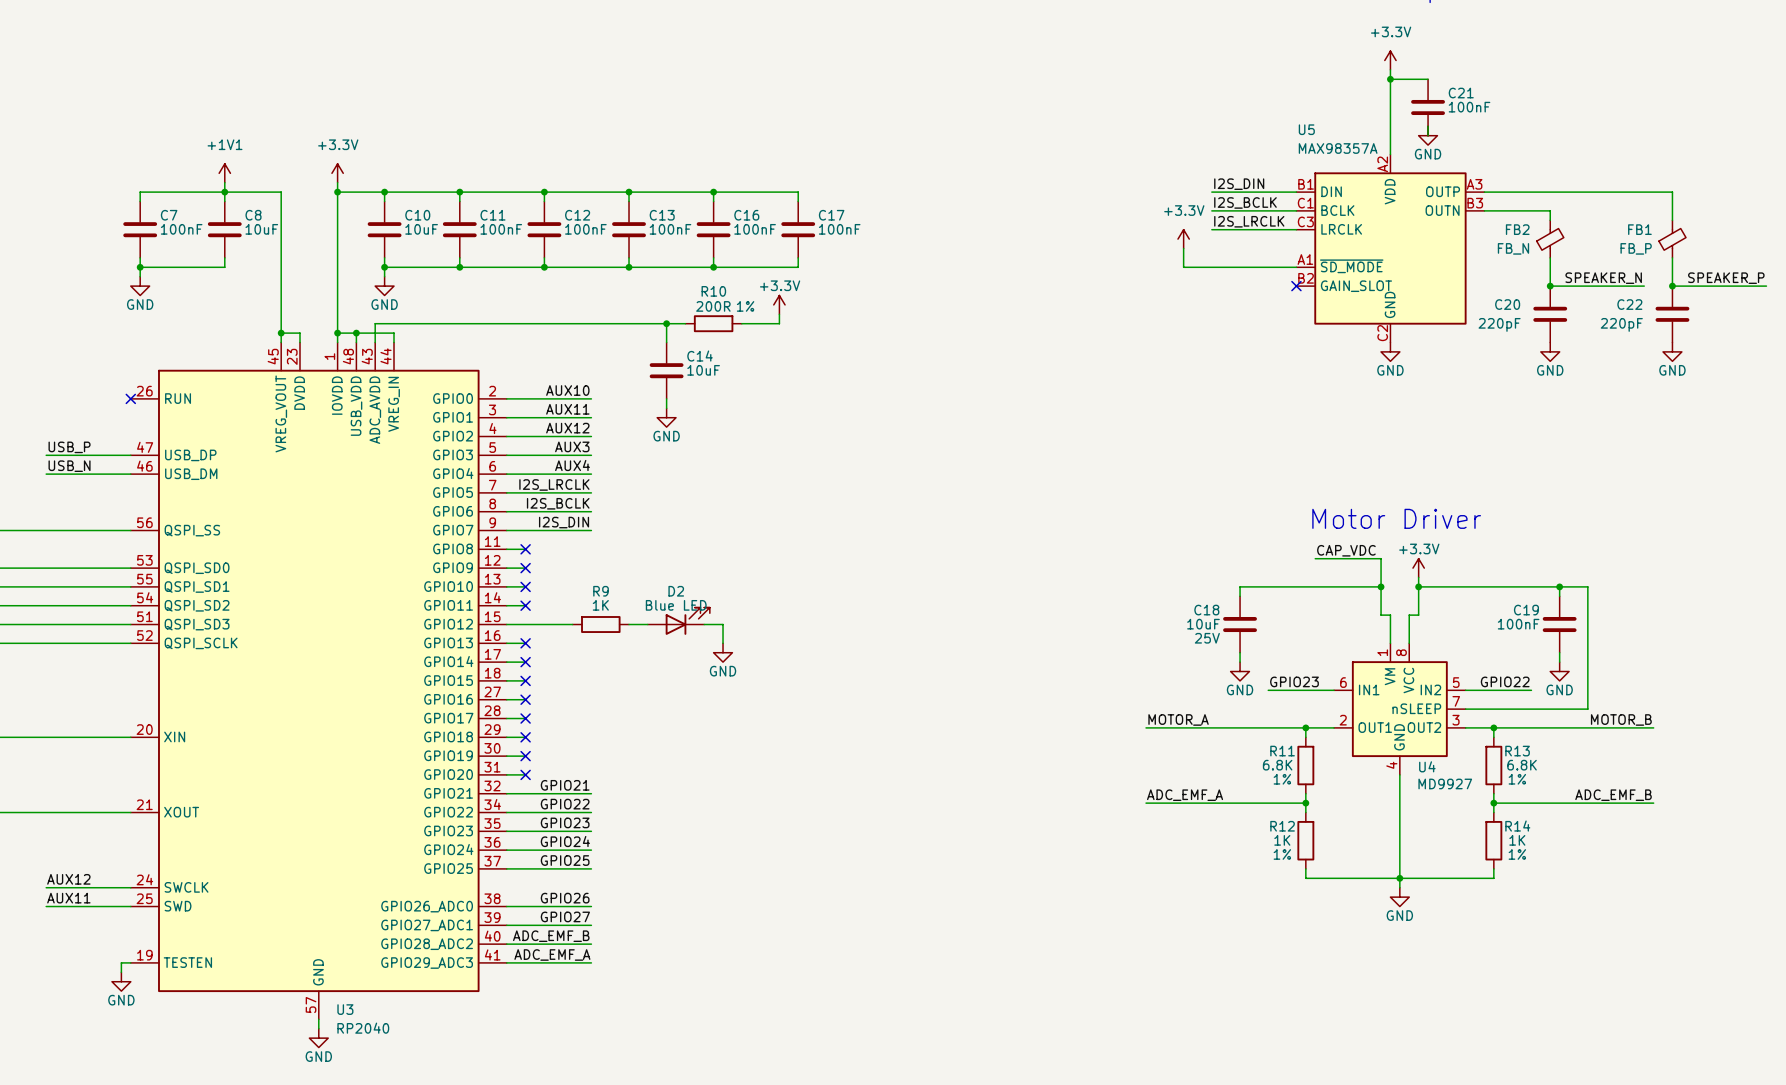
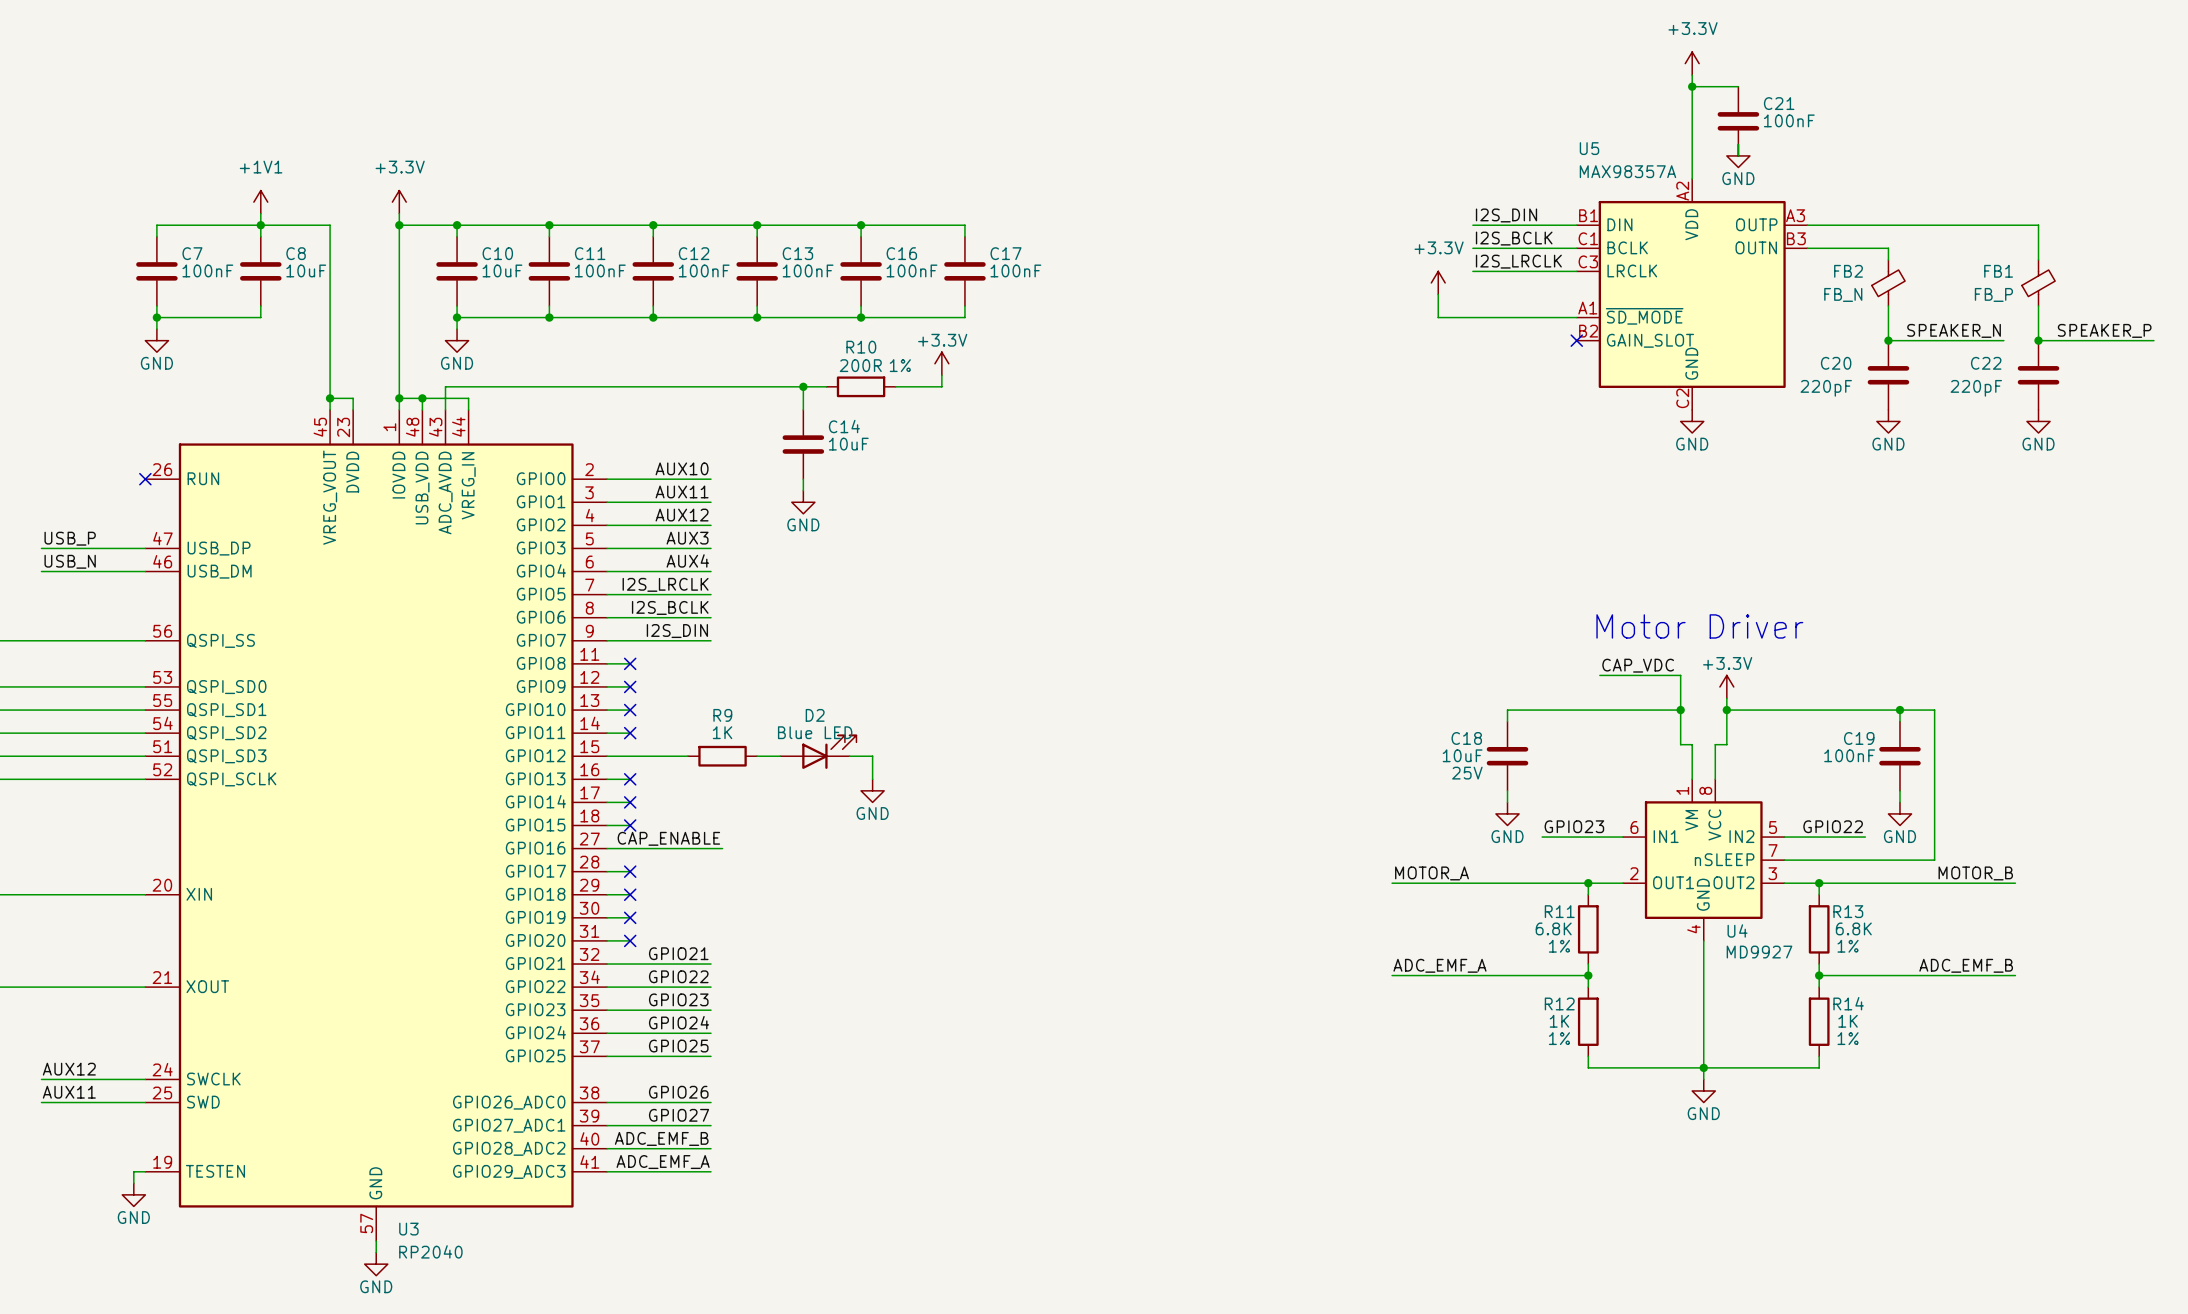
label: none -> CAP_ENABLE (668, 838)
wire: none -> (630, 848) (722, 848)
no-connect mark: (525, 699) -> none

